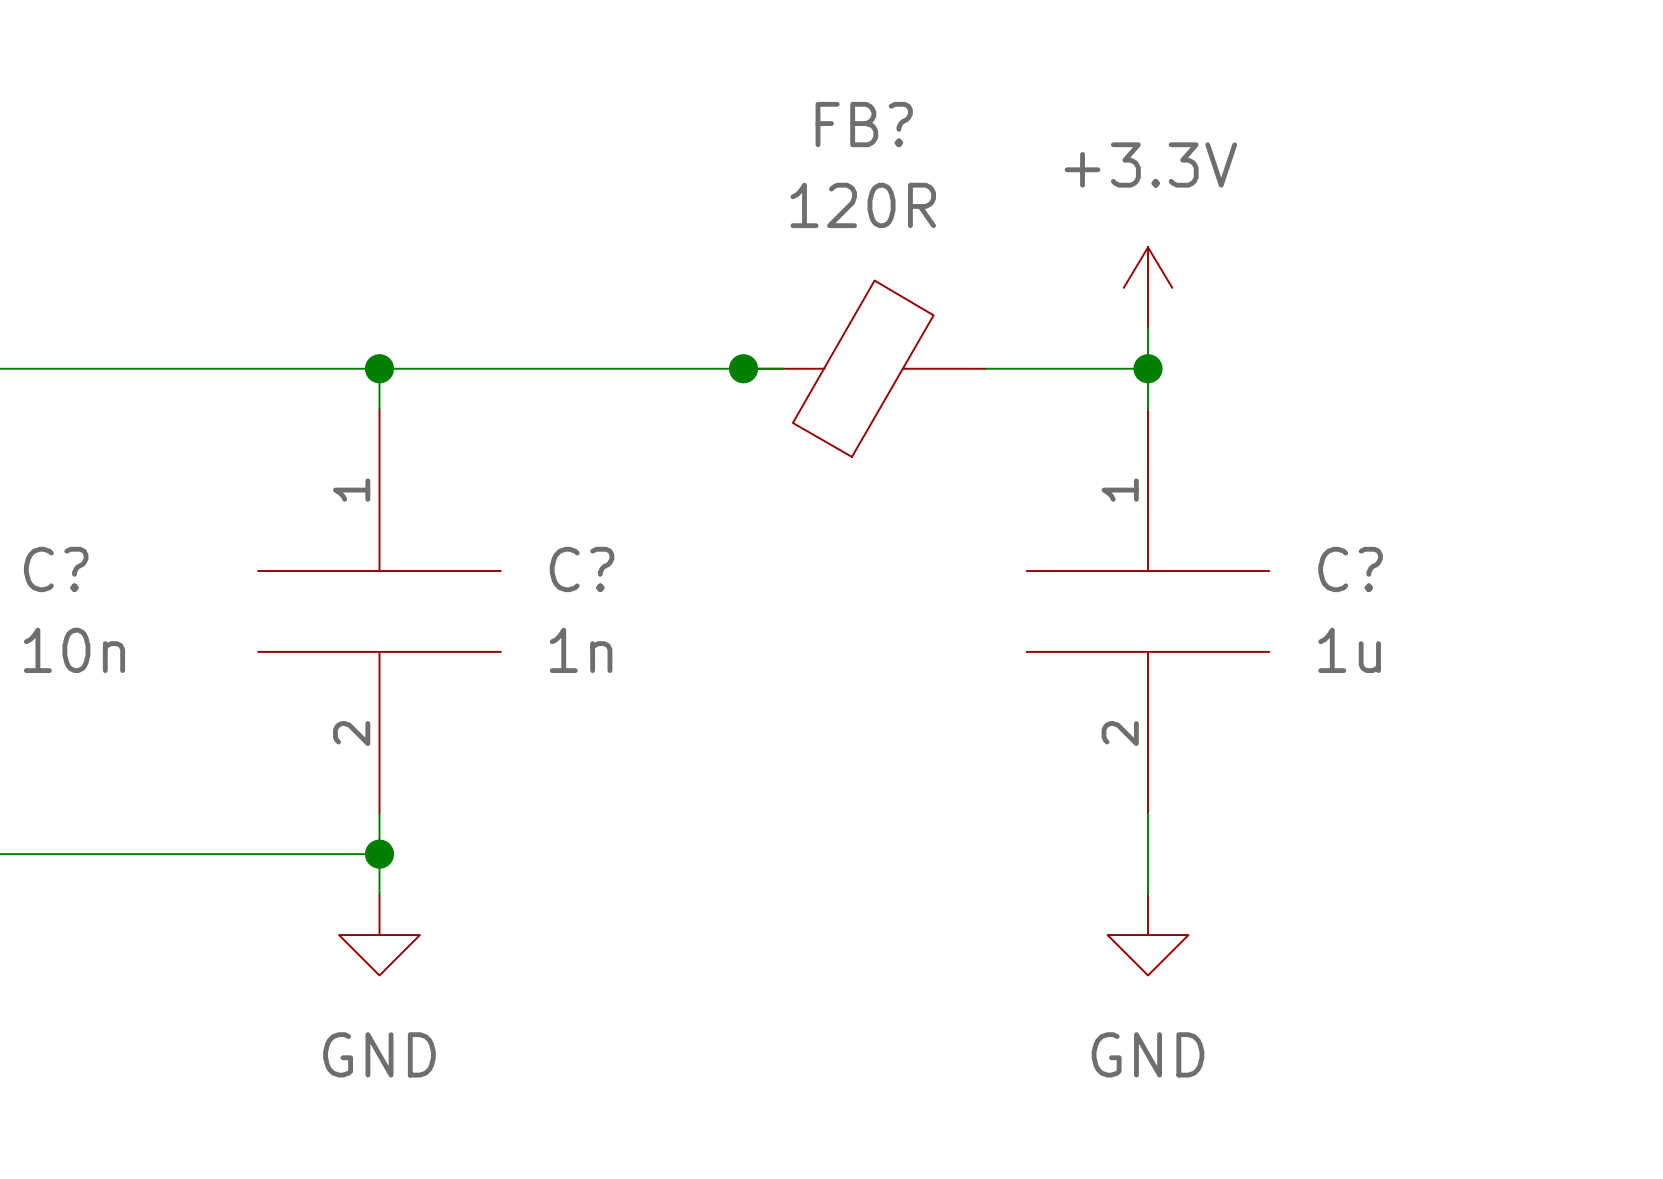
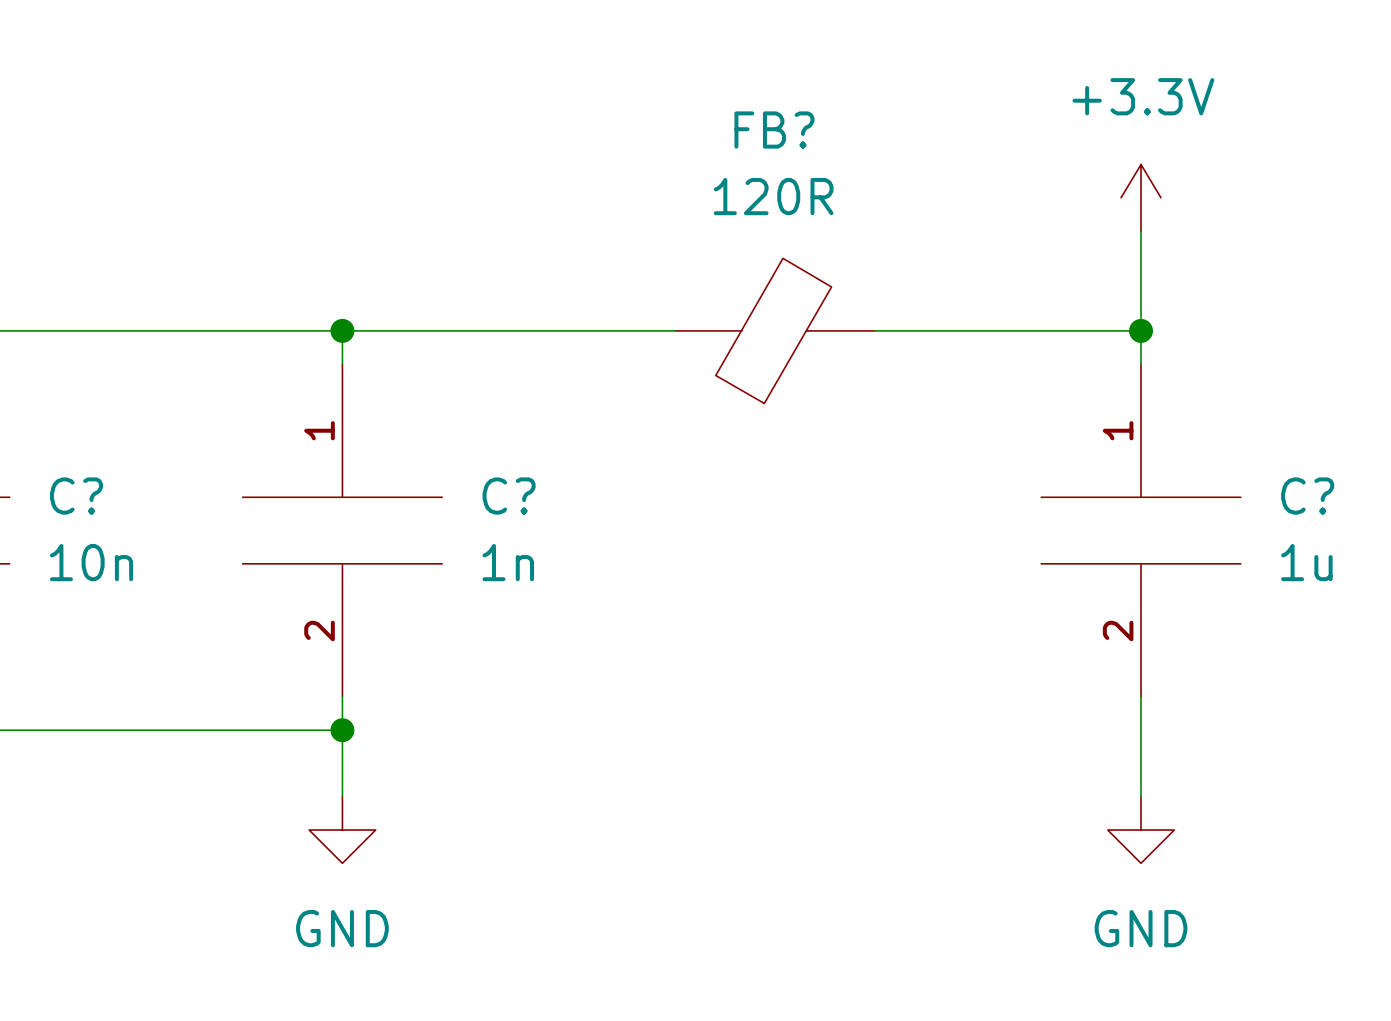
wire: none -> (1141, 231) (1141, 364)
power symbol position: +3.3V (1148, 287) -> +3.3V (1141, 197)
wire: (1148, 328) (1148, 409) -> none
junction: (743, 368) -> none
FB? position: (864, 368) -> (775, 330)
wire: none -> (974, 330) (1141, 330)
junction: (1148, 368) -> none
junction: none -> (1141, 330)
C? position: (1148, 611) -> (1141, 530)
wire: (1148, 813) (1148, 894) -> none
wire: none -> (1141, 696) (1141, 796)
power symbol position: GND (379, 935) -> GND (342, 830)
power symbol position: GND (1148, 935) -> GND (1141, 830)

